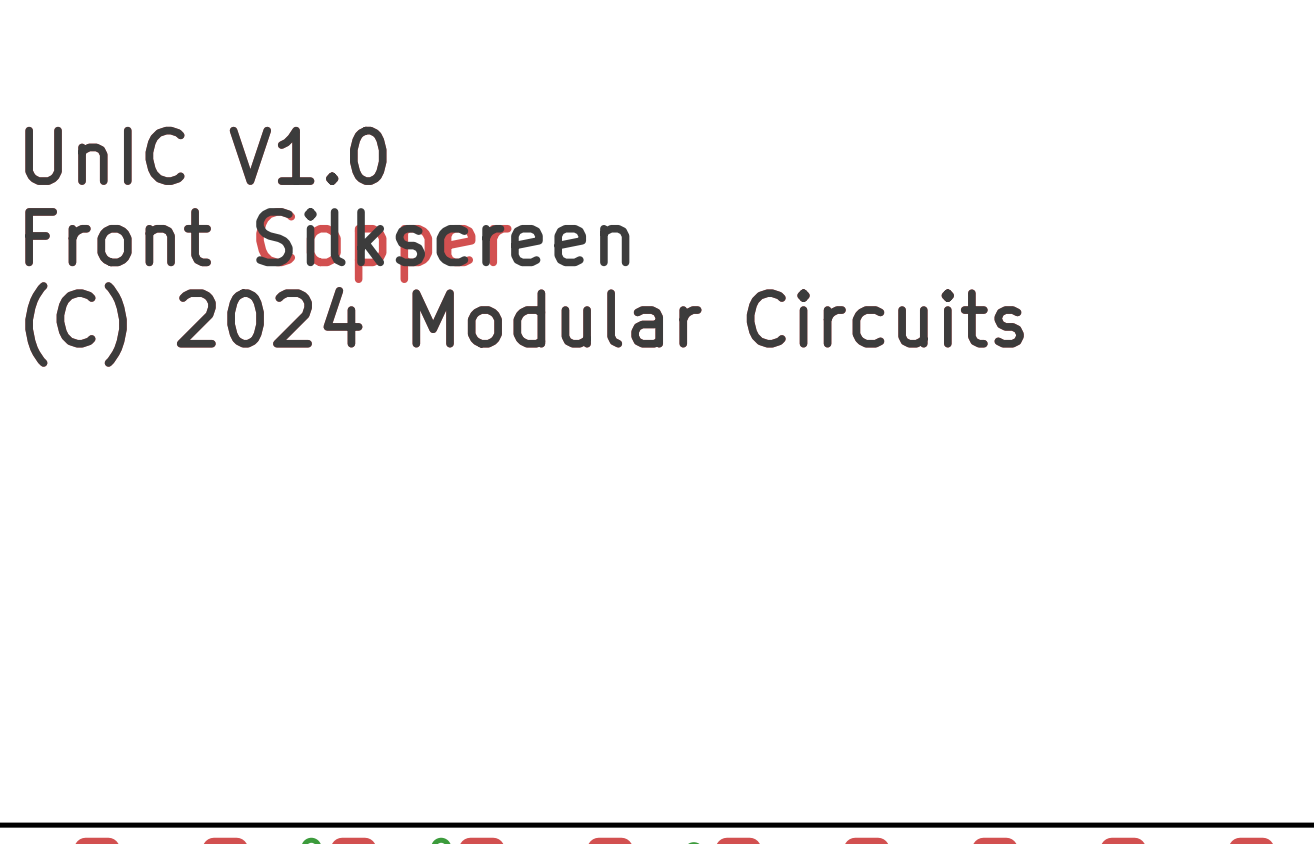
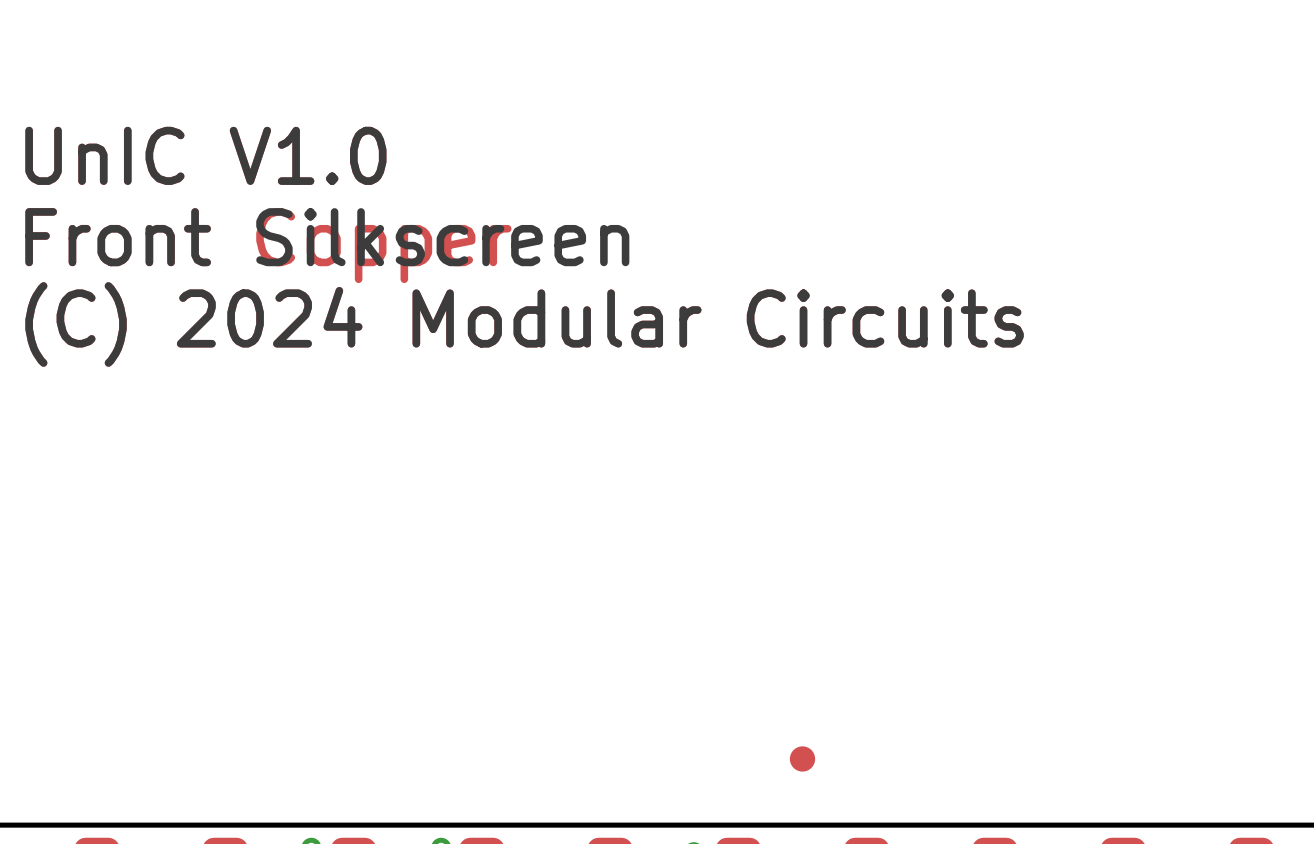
part: none -> (802, 758)

